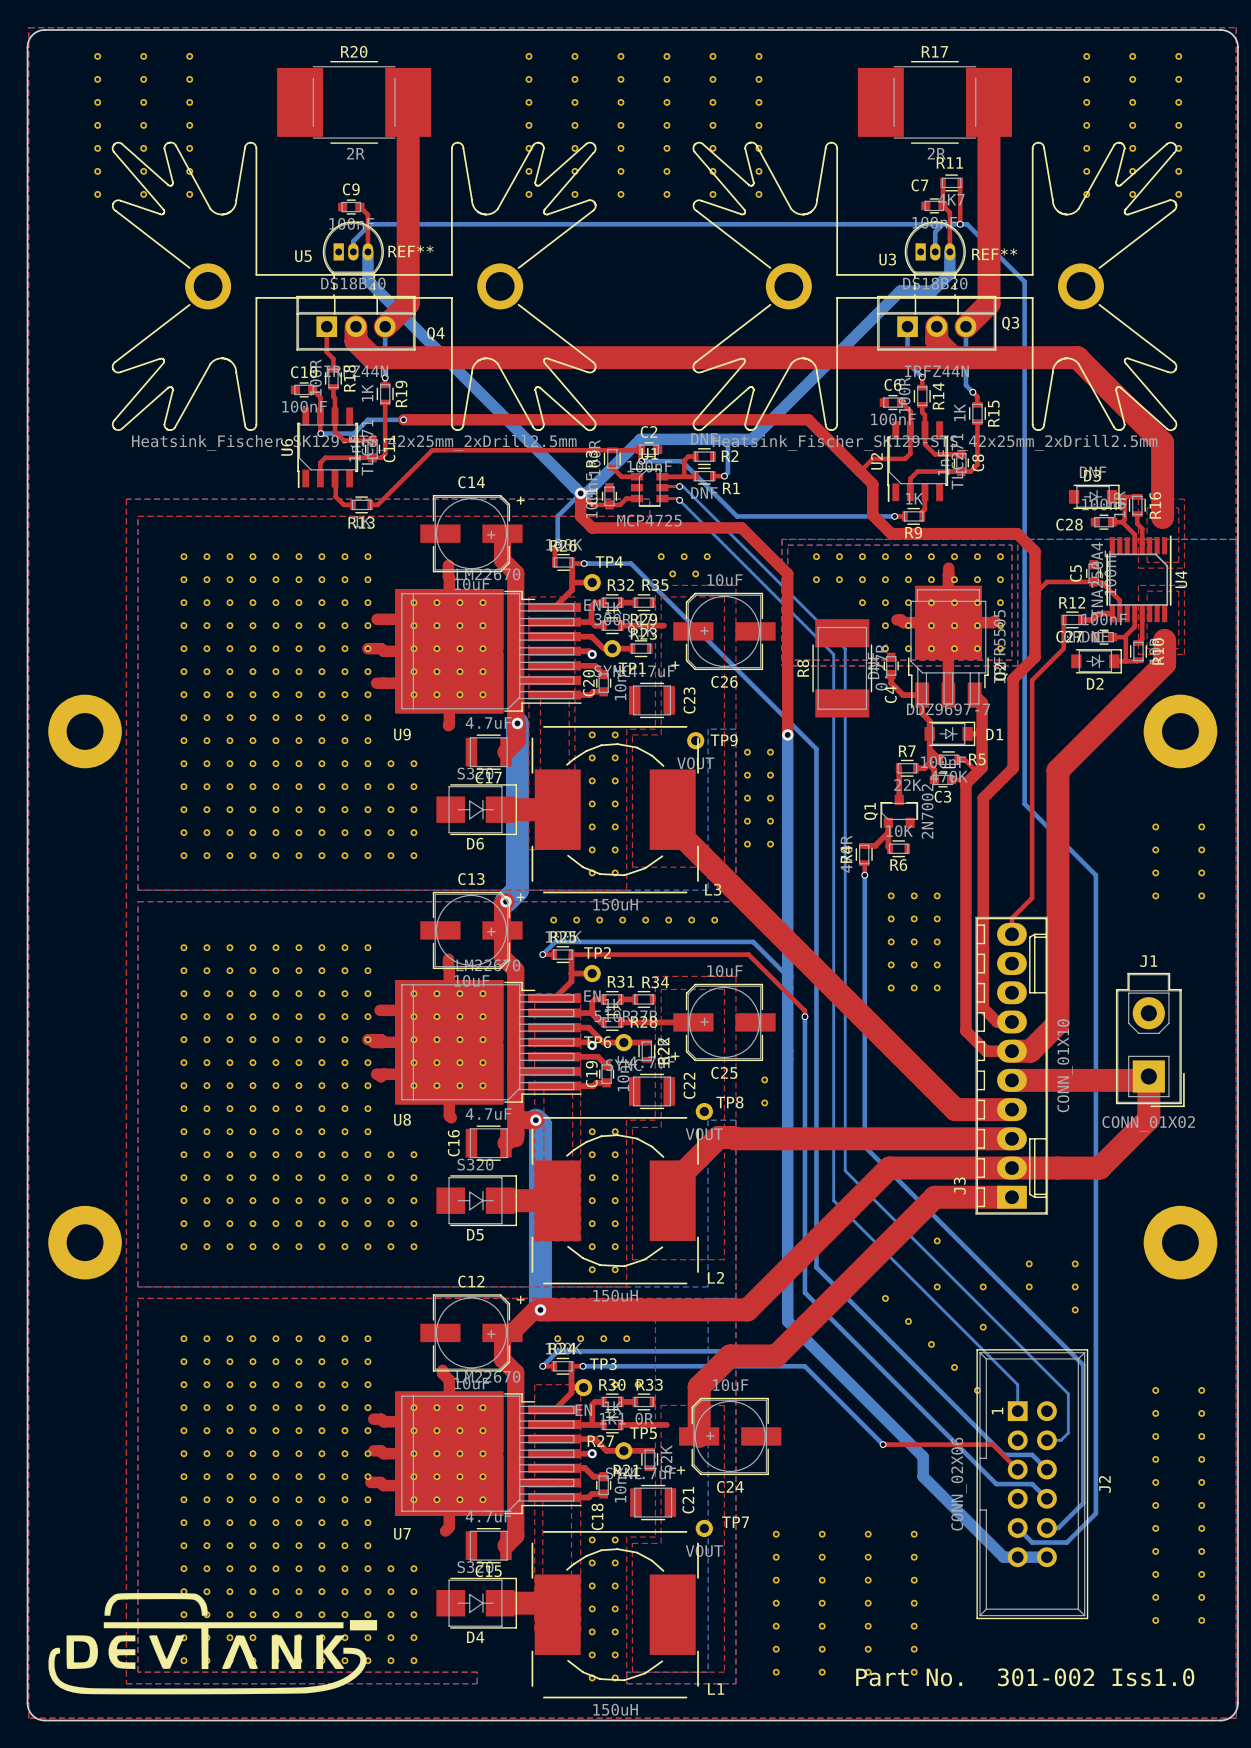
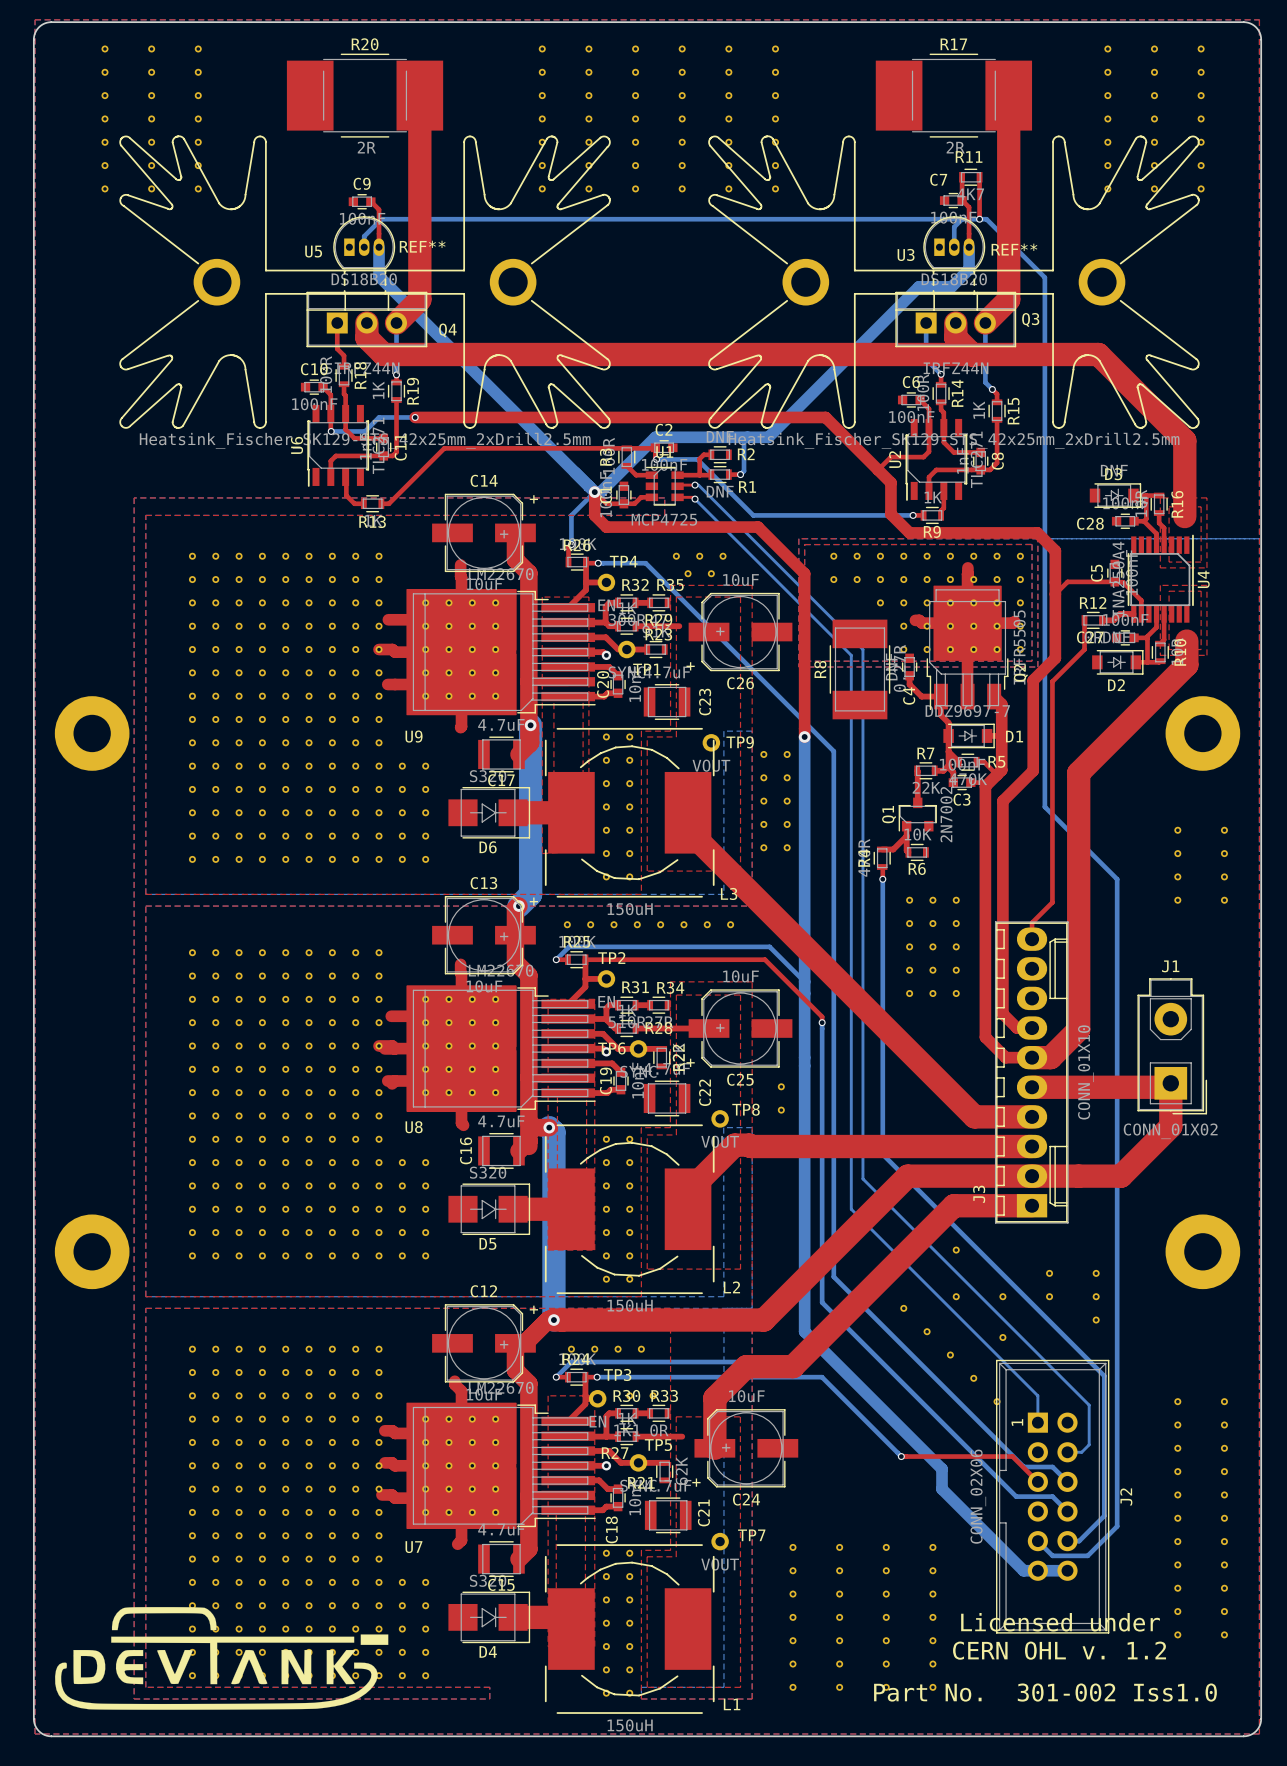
text: none -> Licensed under (1060, 1622)
text: none -> CERN OHL v. 1.2 (1059, 1650)

